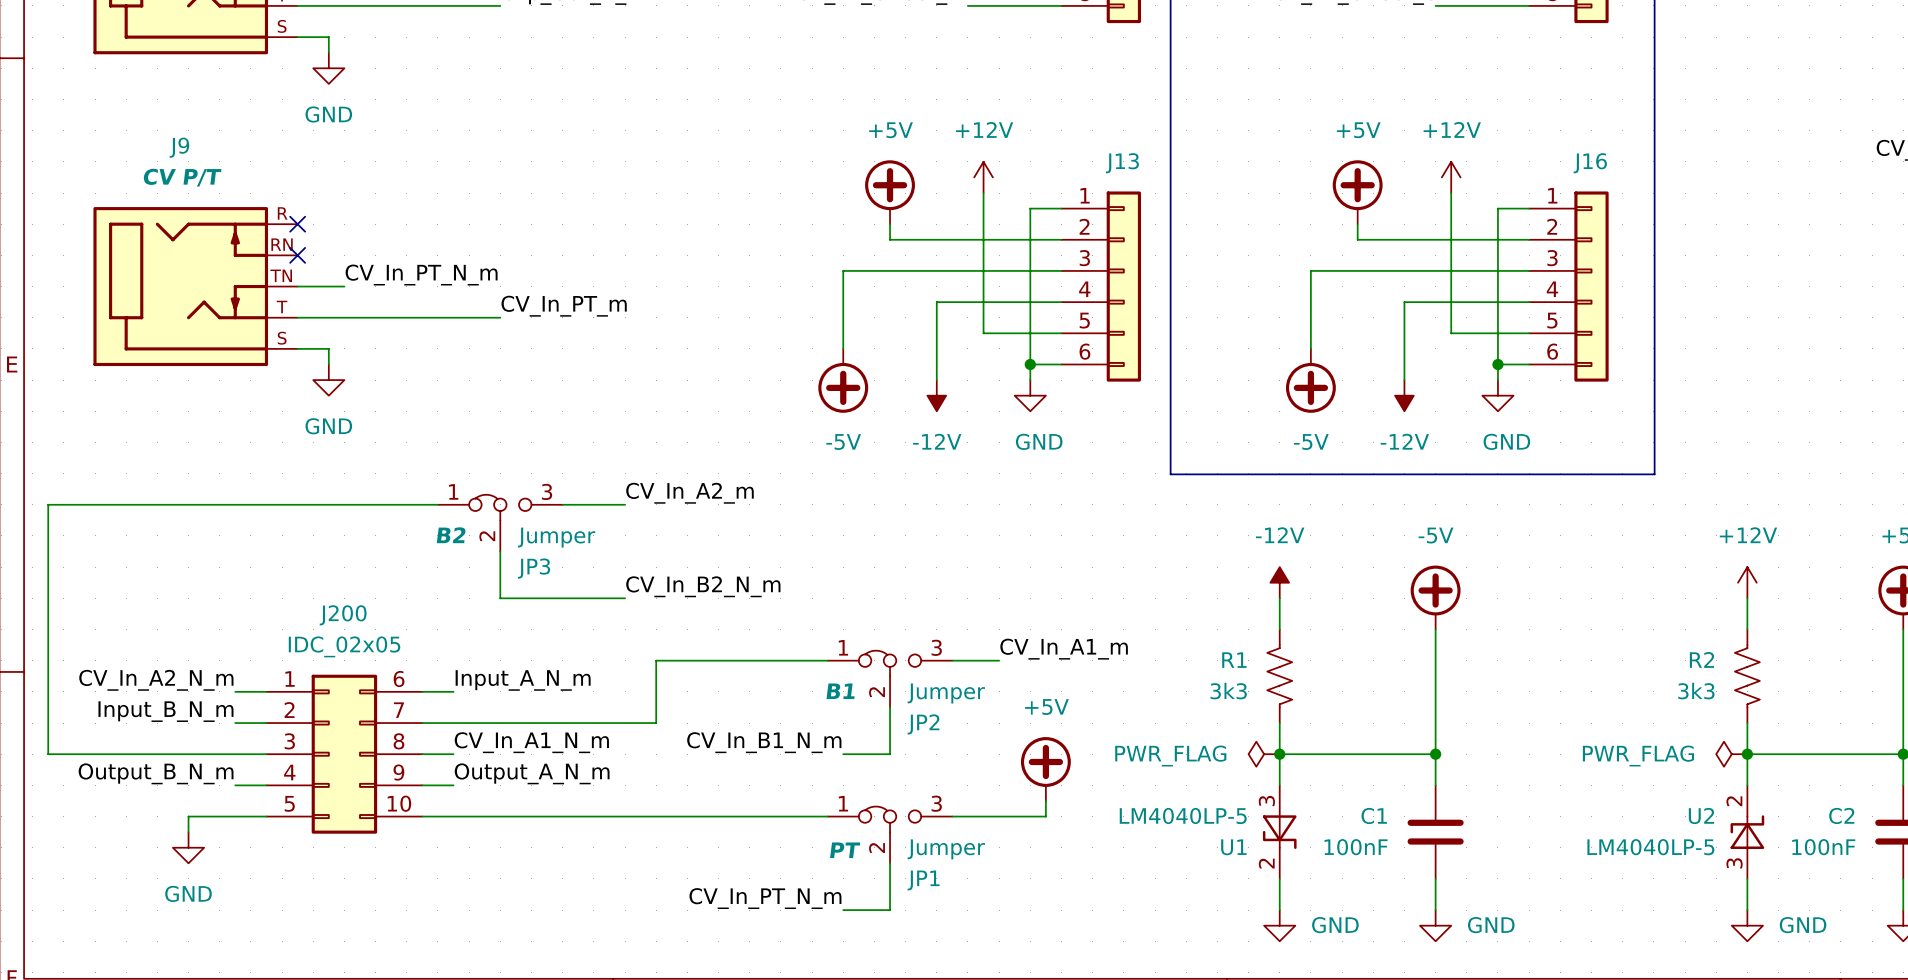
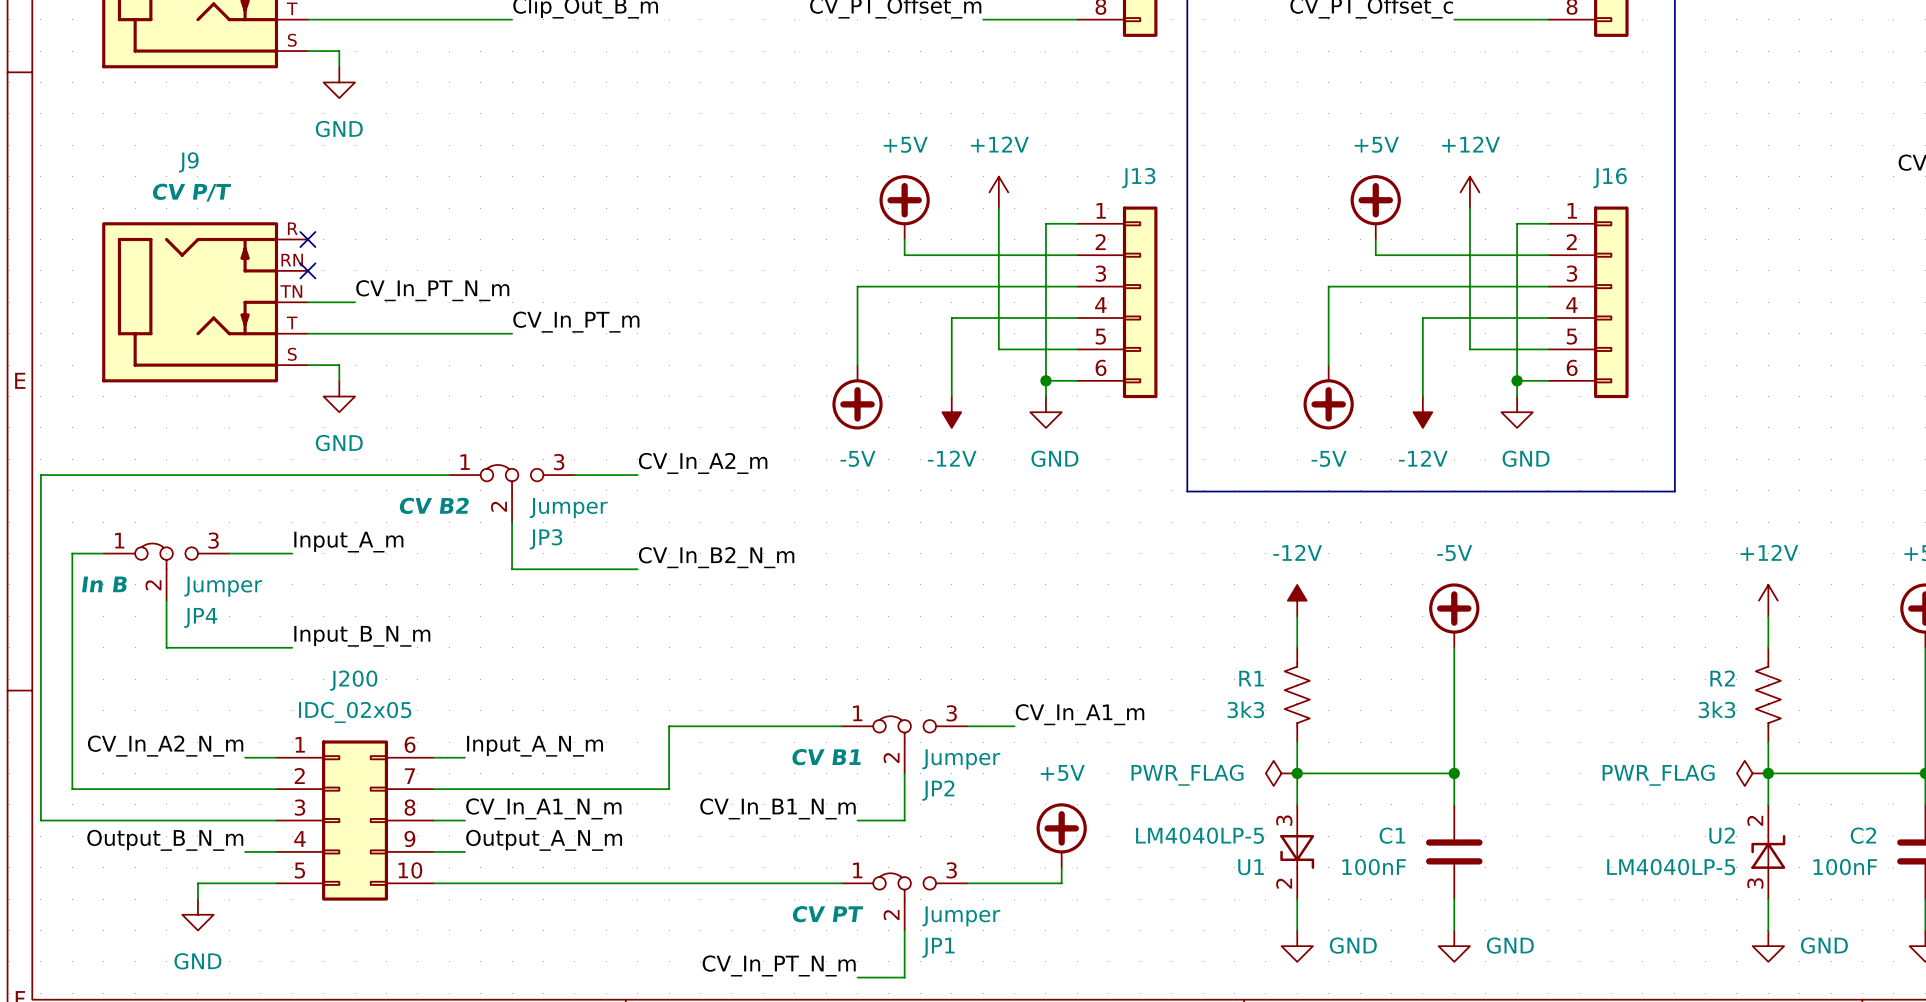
wire: none -> (449, 475) (40, 475) (40, 820) (276, 820)
label position: CV_In_A2_m (689, 493) -> CV_In_A2_m (703, 463)
wire: (437, 504) (48, 504) (48, 754) (266, 754) -> none
wire: (562, 504) (625, 504) -> (574, 475) (637, 475)
JP3 position: (500, 523) -> (512, 493)
label: none -> Input_A_m (348, 542)
wire: none -> (103, 553) (72, 553) (72, 789) (276, 789)
wire: none -> (229, 553) (292, 553)
JP3 text: B2 (451, 535) -> CV B2 (434, 505)
wire: (500, 551) (500, 598) (625, 598) -> (512, 522) (512, 569) (637, 569)
JP4: none -> Jumper (166, 572)
wire: none -> (166, 600) (166, 647) (292, 647)
label position: CV_In_B2_N_m (703, 586) -> CV_In_B2_N_m (716, 557)
label position: CV_In_A1_m (1064, 649) -> CV_In_A1_m (1080, 714)
wire: (827, 660) (656, 660) (656, 707) -> (841, 726) (669, 726)
wire: (952, 660) (999, 660) -> (967, 726) (1014, 726)
JP2 position: (890, 679) -> (904, 744)
label position: CV_In_A2_N_m (156, 680) -> CV_In_A2_N_m (165, 746)
label position: Input_A_N_m (523, 680) -> Input_A_N_m (535, 746)
wire: (235, 691) (266, 691) -> (245, 757) (276, 757)
wire: (422, 691) (453, 691) -> (433, 757) (464, 757)
JP2 text: B1 (840, 691) -> CV B1 (826, 757)
wire: (890, 707) (890, 754) (843, 754) -> (904, 773) (904, 820) (857, 820)
label position: Input_B_N_m (165, 711) -> Input_B_N_m (362, 636)
wire: (235, 723) (266, 723) -> none
wire: (422, 723) (656, 723) -> (433, 789) (669, 789) (669, 742)
label position: CV_In_A1_N_m (531, 742) -> CV_In_A1_N_m (543, 808)
label position: CV_In_B1_N_m (764, 742) -> CV_In_B1_N_m (778, 808)
J200 position: (344, 754) -> (355, 820)
wire: (422, 754) (453, 754) -> (433, 820) (464, 820)
power symbol position: +5V (1045, 769) -> +5V (1061, 835)
label position: Output_B_N_m (156, 773) -> Output_B_N_m (165, 840)
label position: Output_A_N_m (532, 773) -> Output_A_N_m (544, 840)
wire: (235, 785) (266, 785) -> (245, 851) (276, 851)
wire: (422, 785) (453, 785) -> (433, 851) (464, 851)
wire: (1045, 800) (1045, 816) (952, 816) -> (1061, 867) (1061, 883) (967, 883)
wire: (266, 816) (188, 816) (188, 832) -> (276, 883) (197, 883) (197, 899)
wire: (422, 816) (827, 816) -> (433, 883) (841, 883)
JP1 position: (890, 834) -> (904, 901)
power symbol position: GND (188, 847) -> GND (197, 914)
JP1 text: PT (845, 850) -> CV PT (827, 914)
wire: (890, 863) (890, 910) (843, 910) -> (904, 930) (904, 977) (857, 977)
label position: CV_In_PT_N_m (765, 898) -> CV_In_PT_N_m (779, 965)

